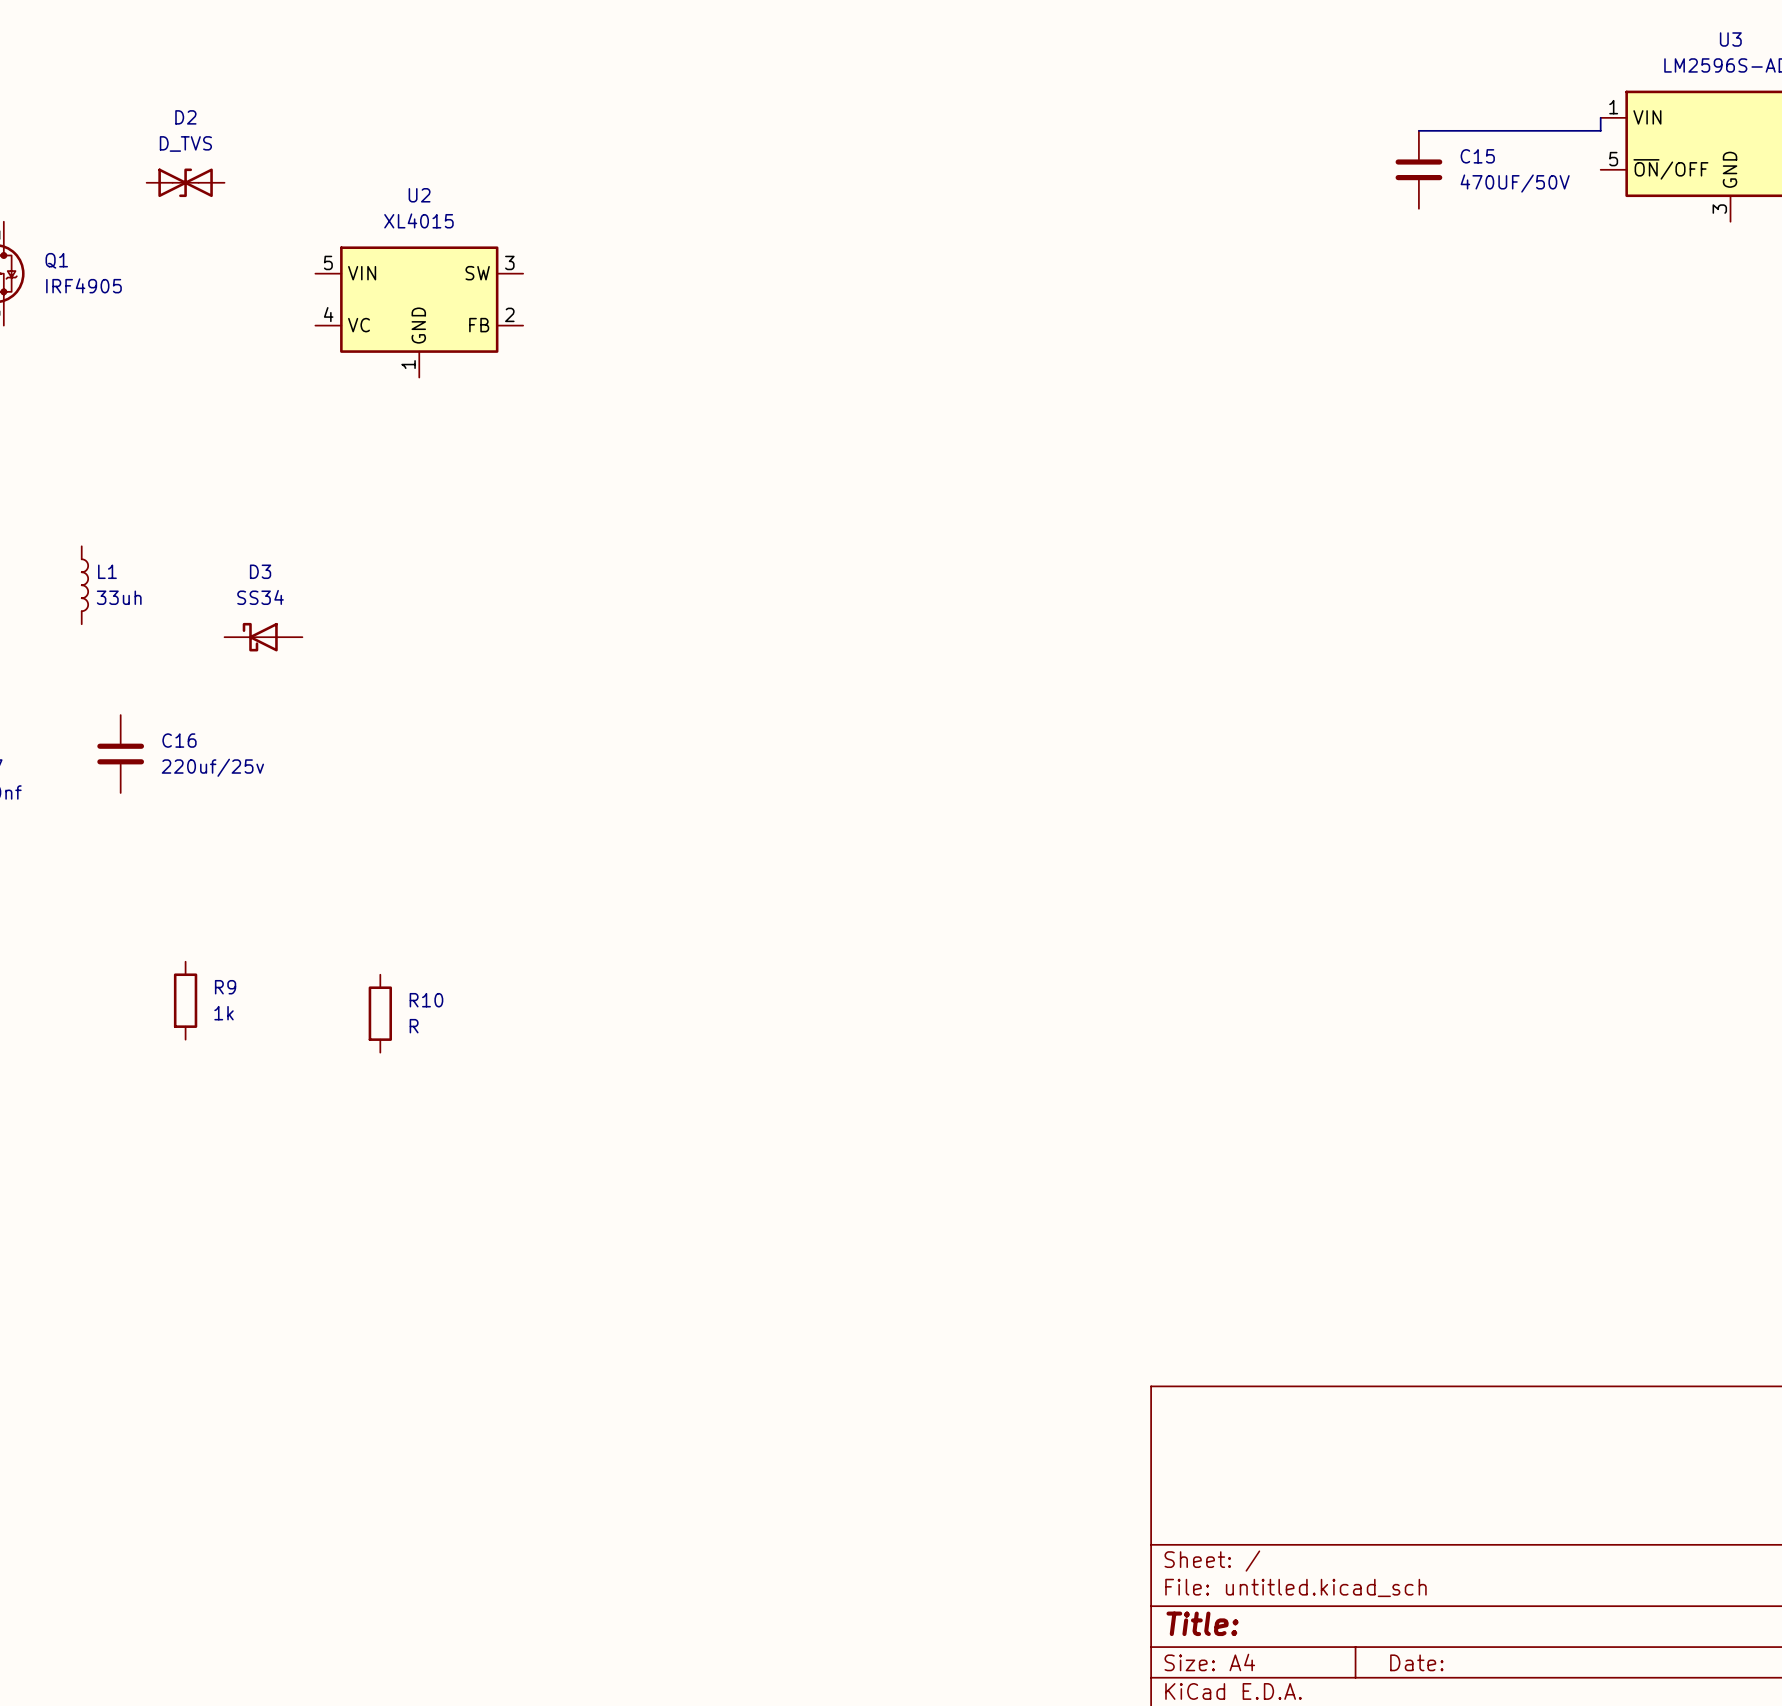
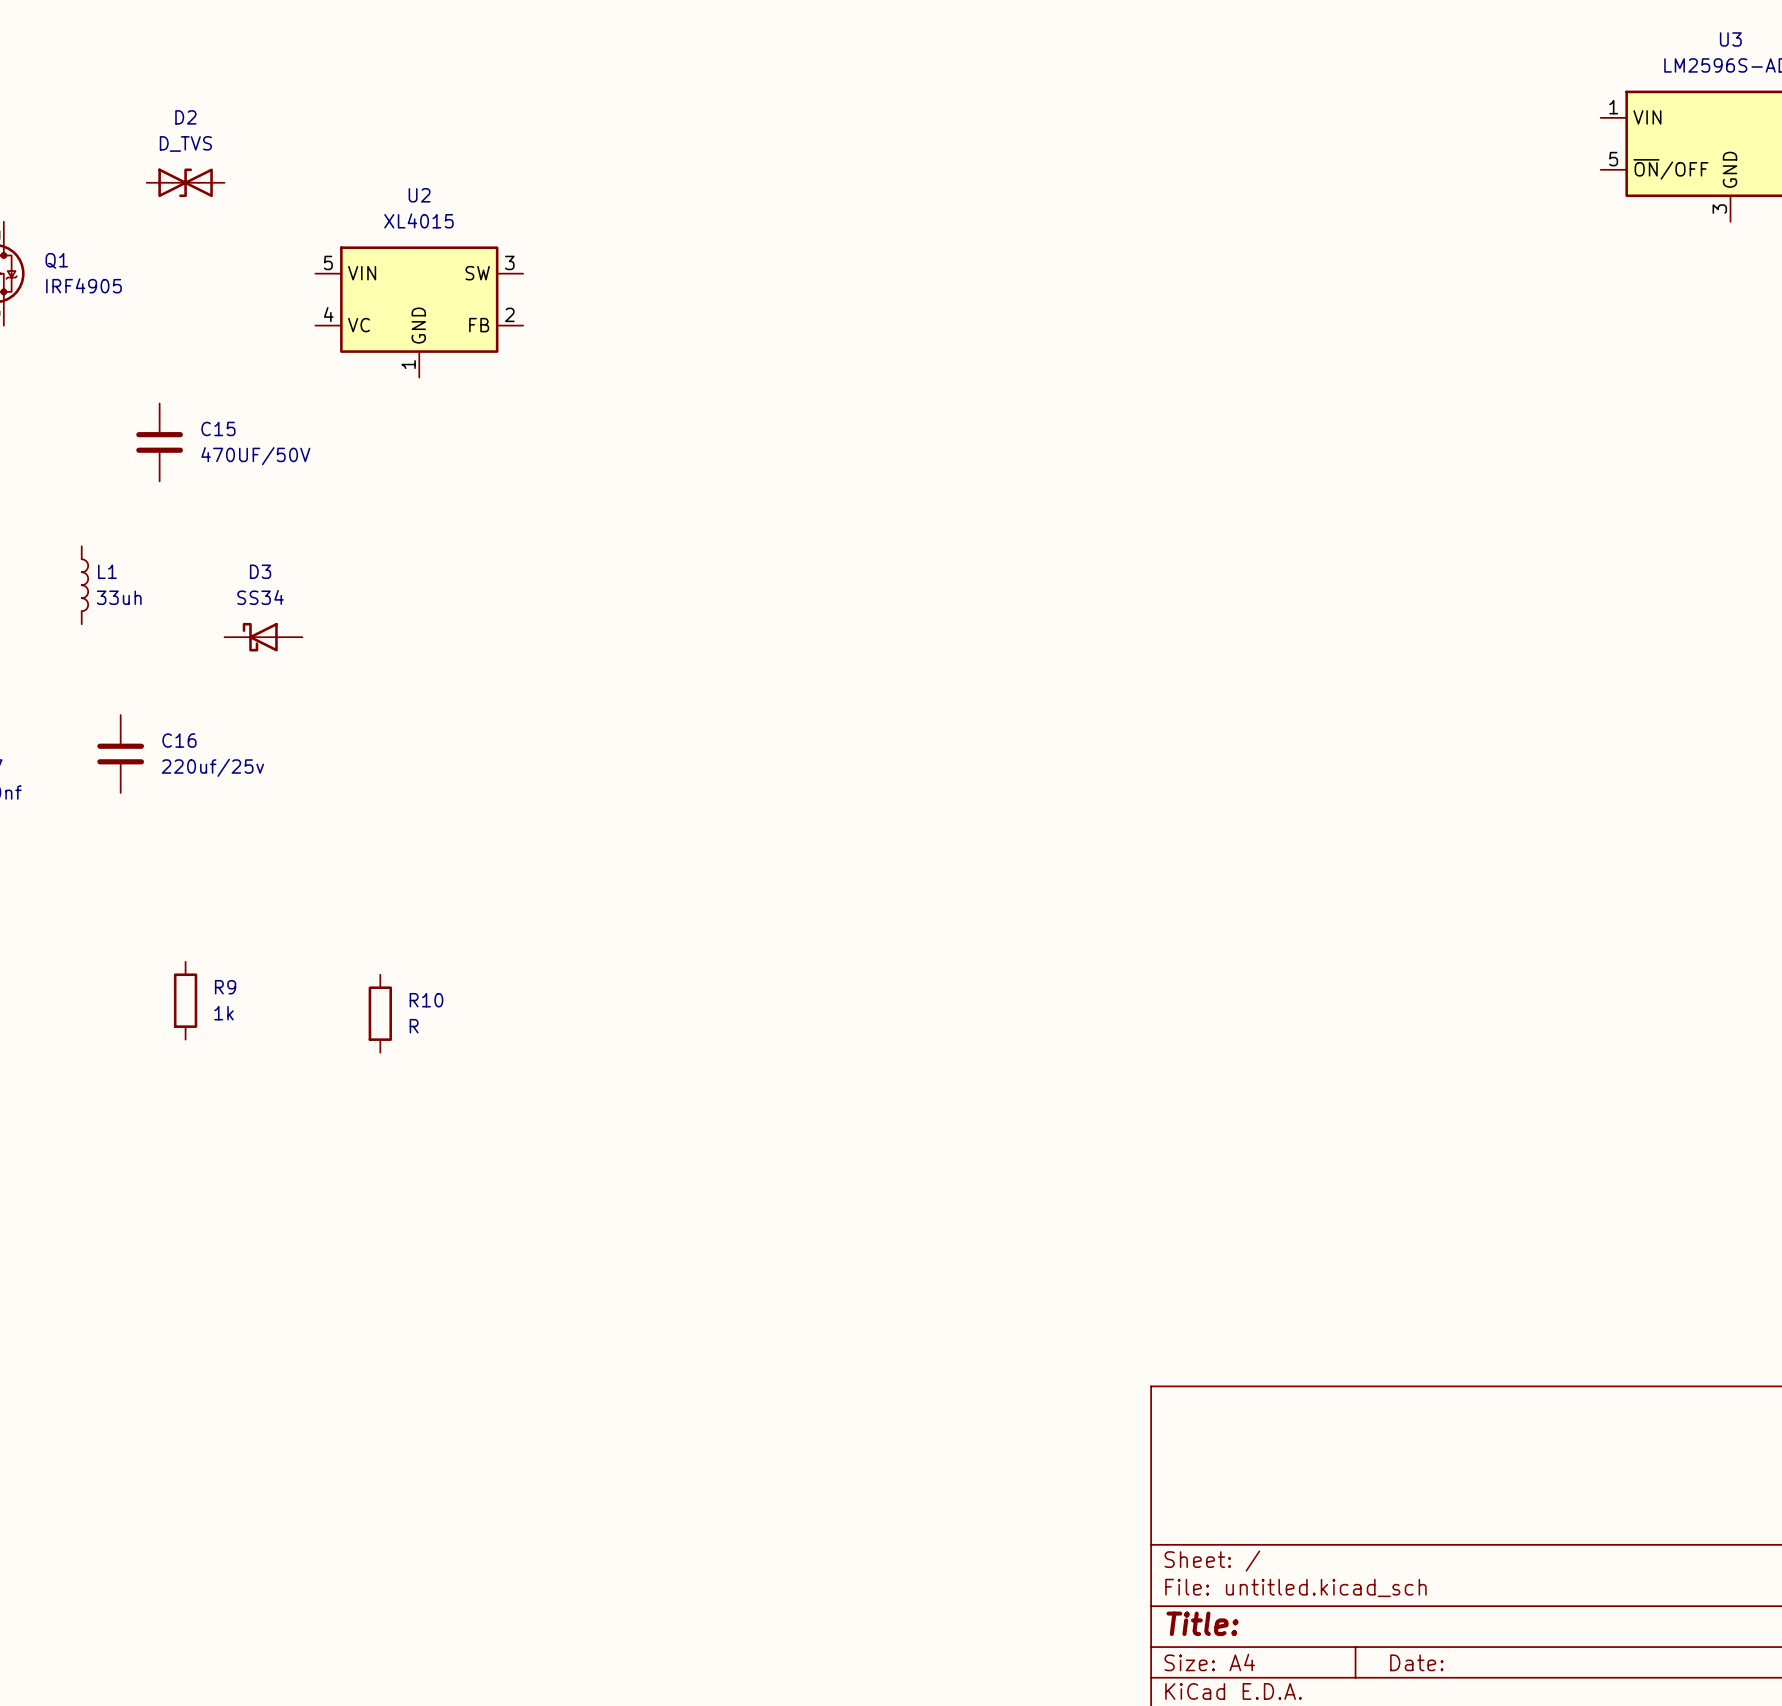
wire: (1600, 117) (1600, 130) (1418, 130) -> none
C15 position: (1418, 169) -> (159, 442)

